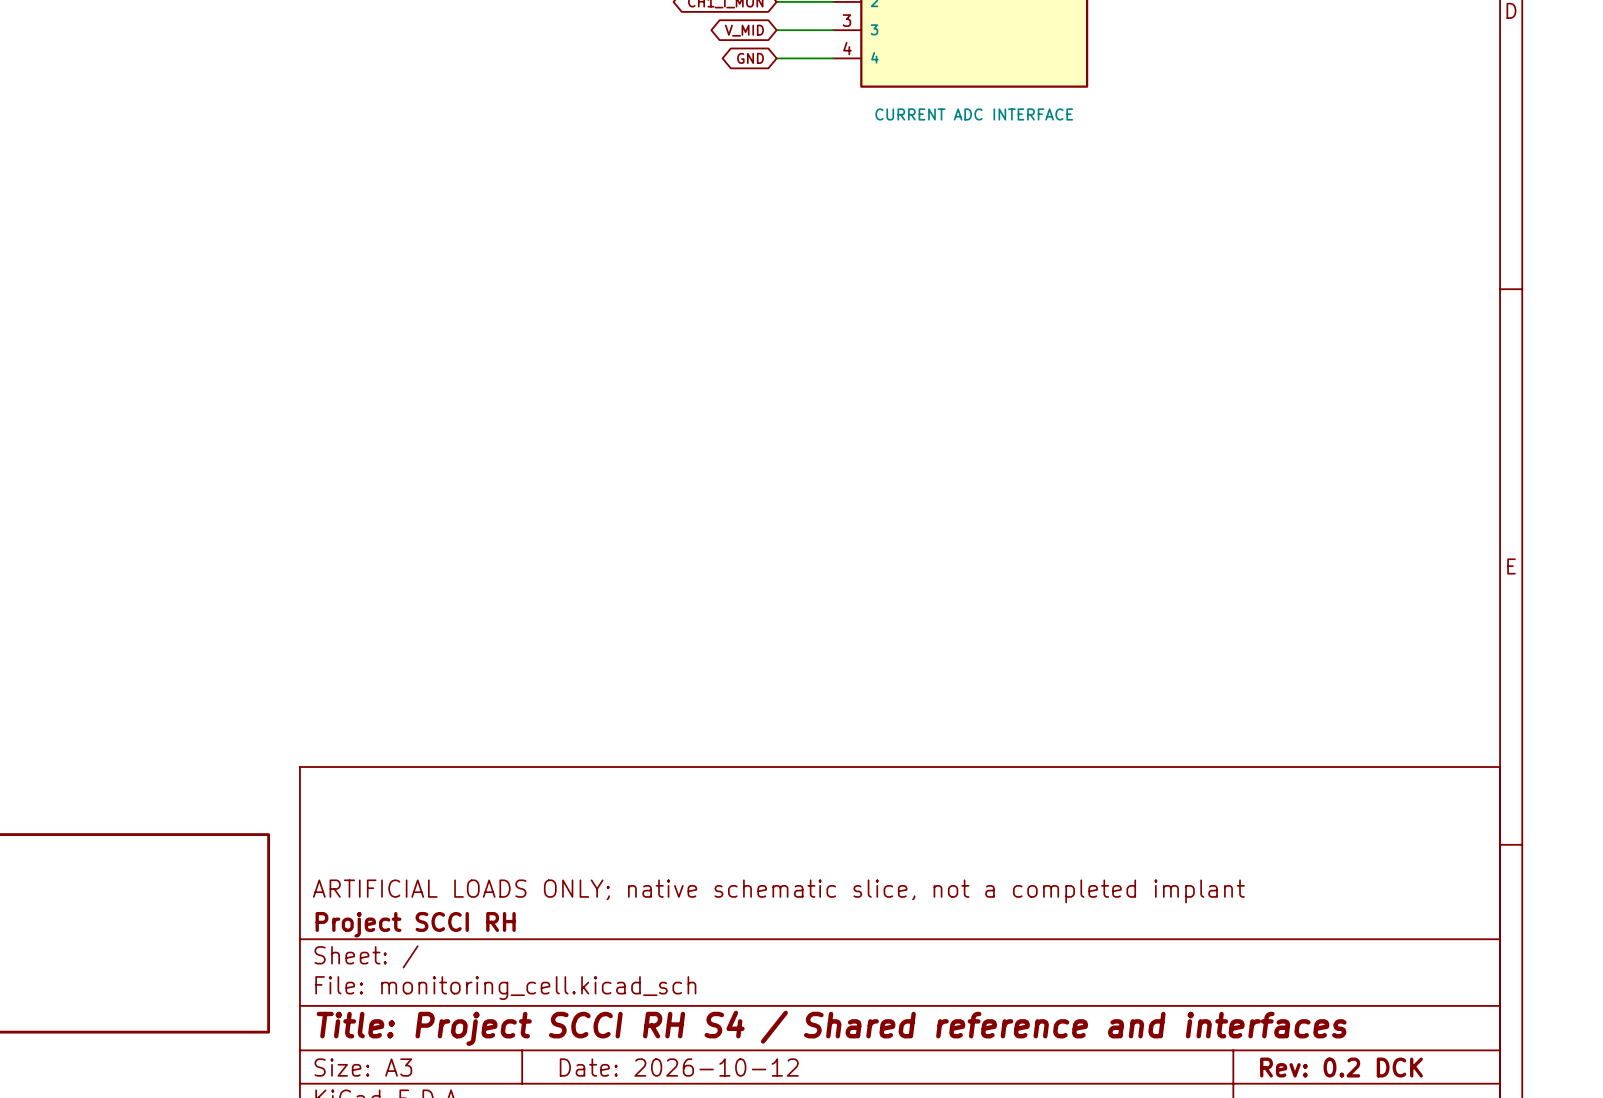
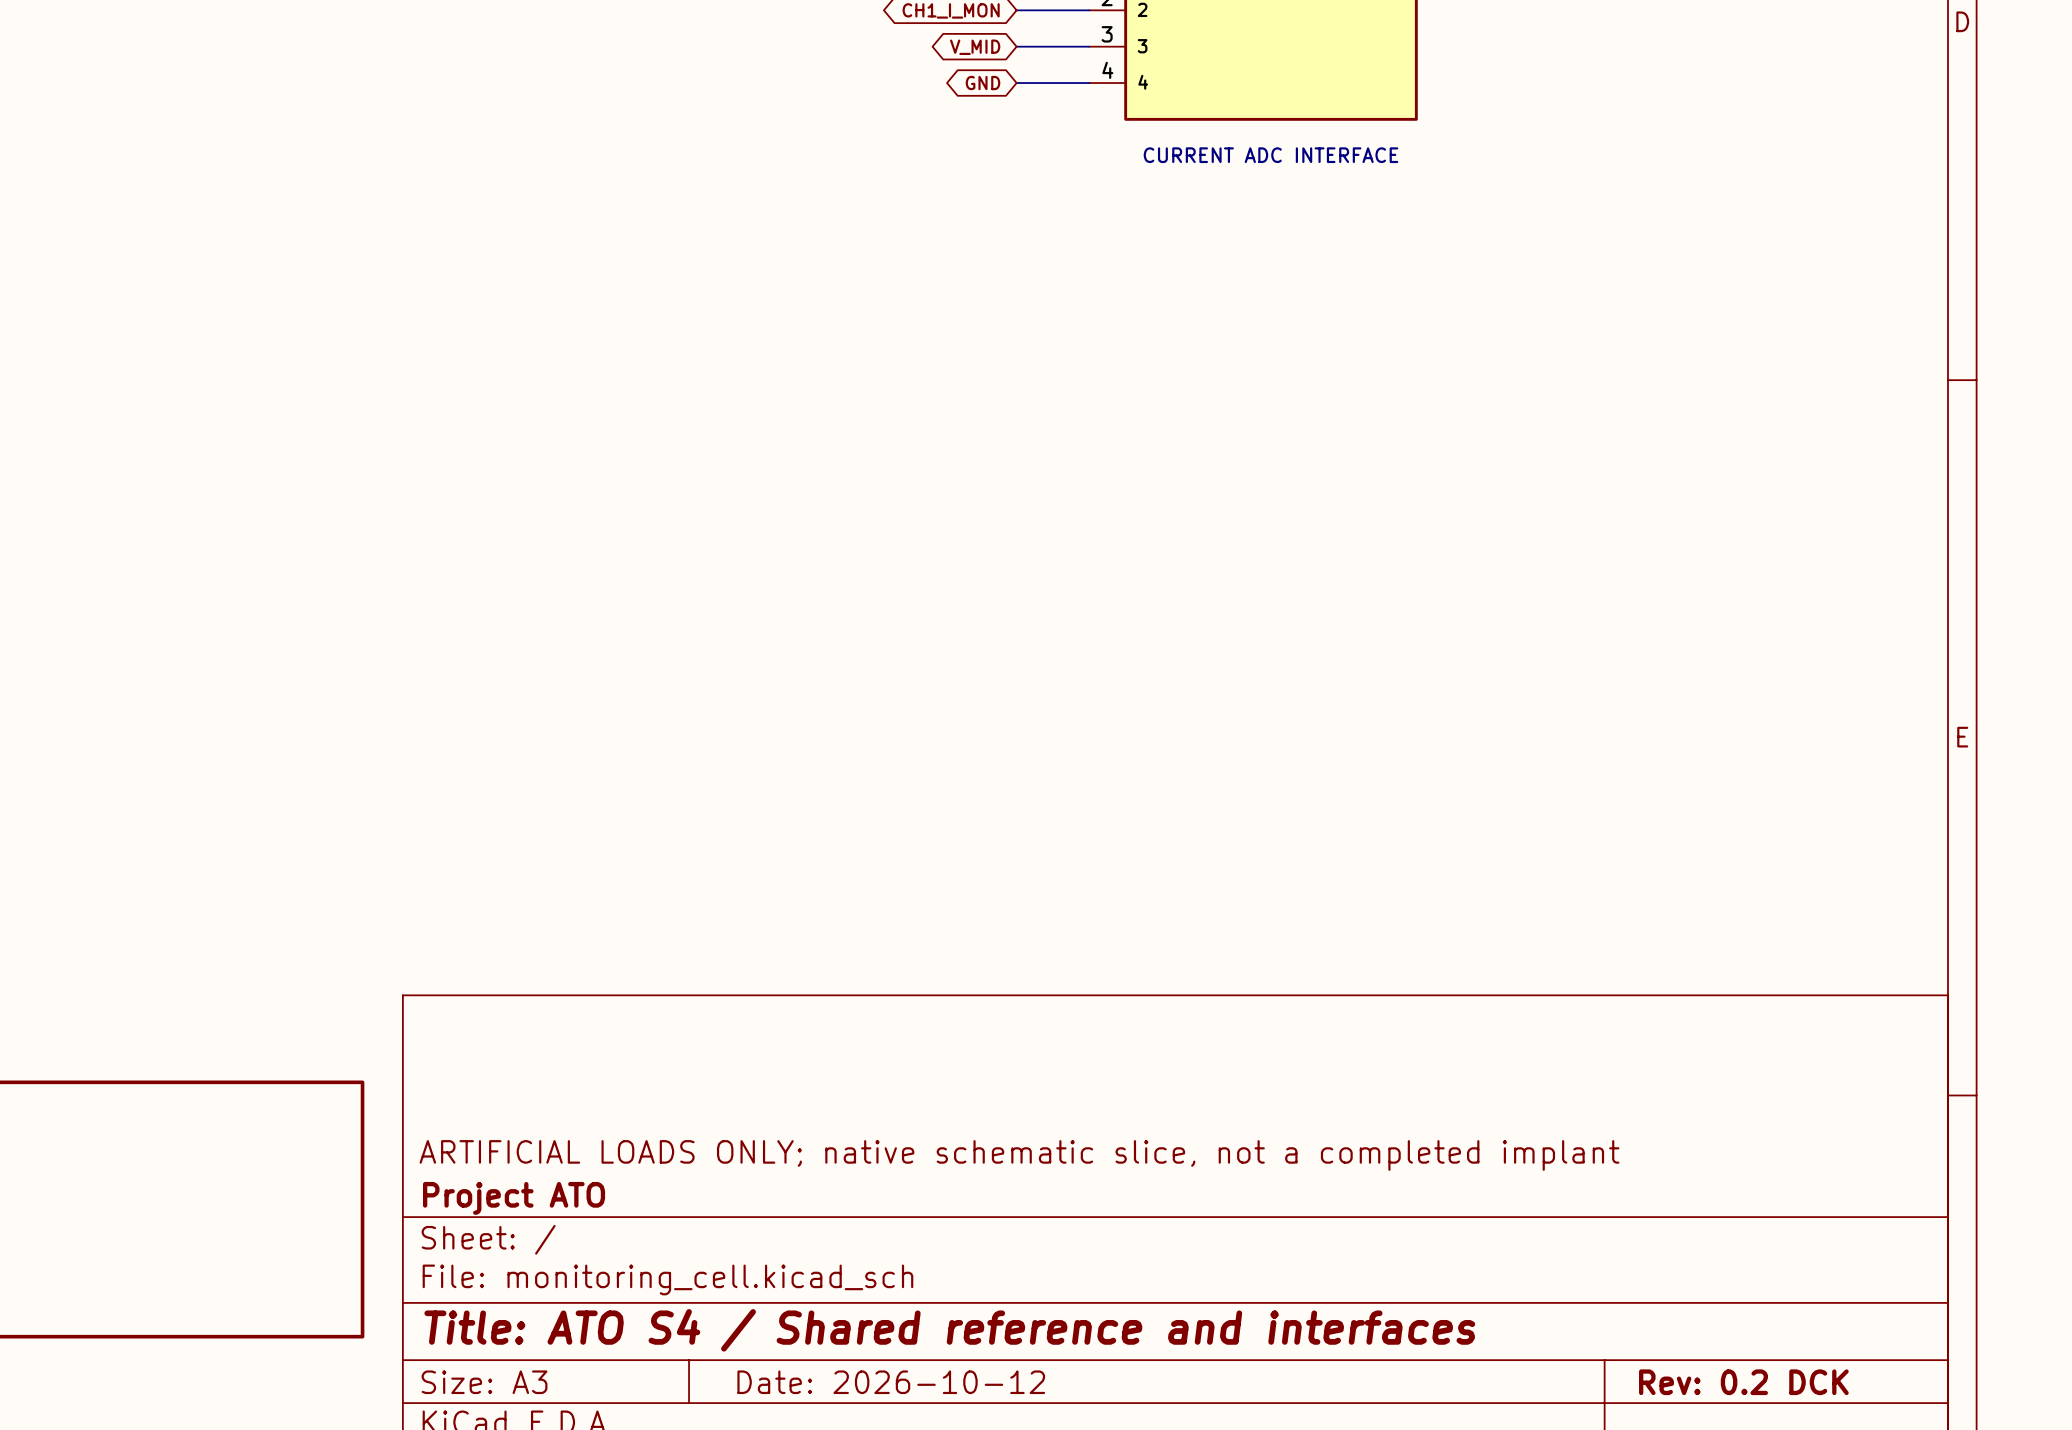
title block: Project SCCI RH (415, 924) -> Project ATO (514, 1198)
title block: Title: Project SCCI RH S4 / Shared reference and interfaces (831, 1028) -> Title: ATO S4 / Shared reference and interfaces (949, 1330)

